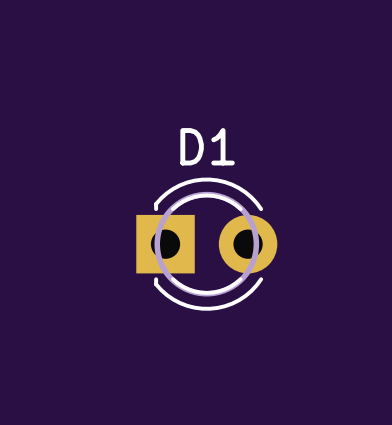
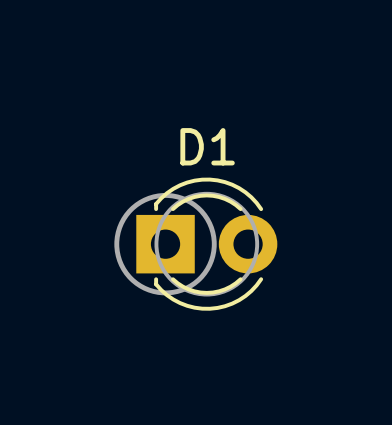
D1 footprint: [136, 177, 278, 311] -> [114, 177, 278, 311]

